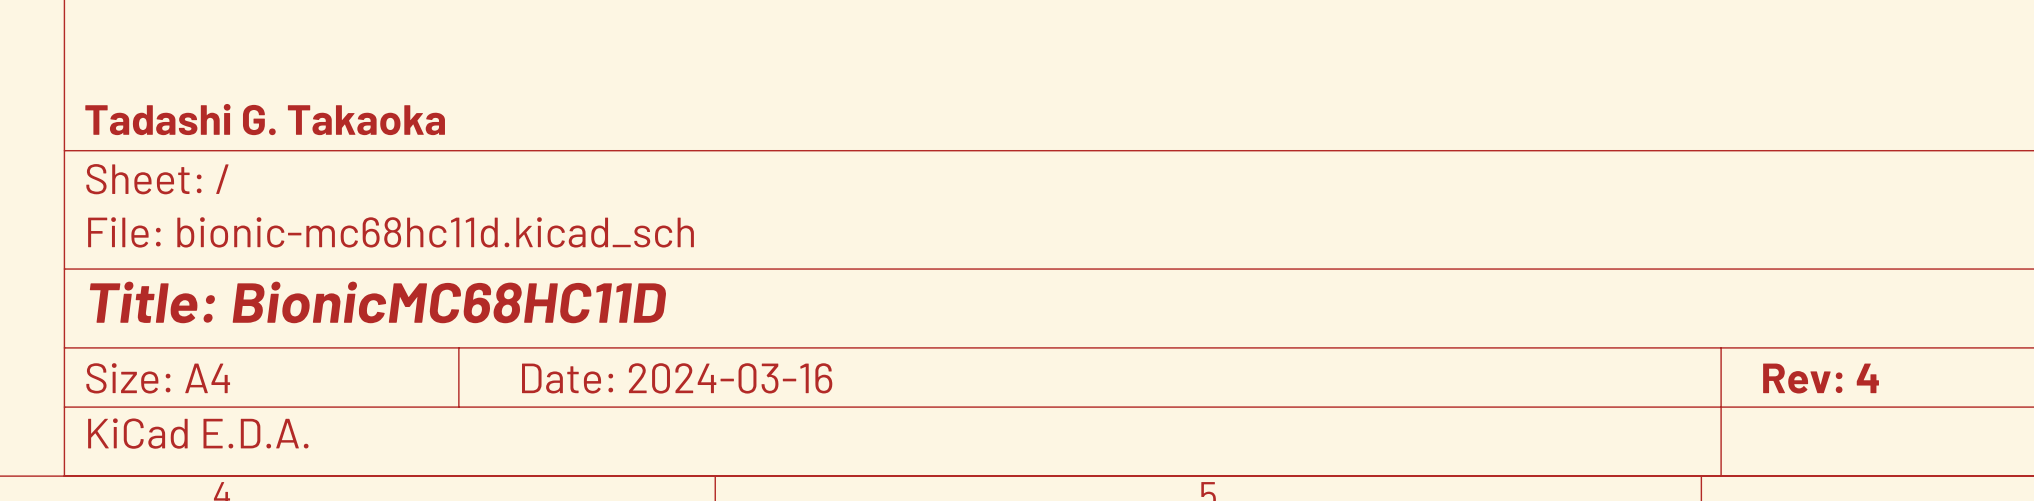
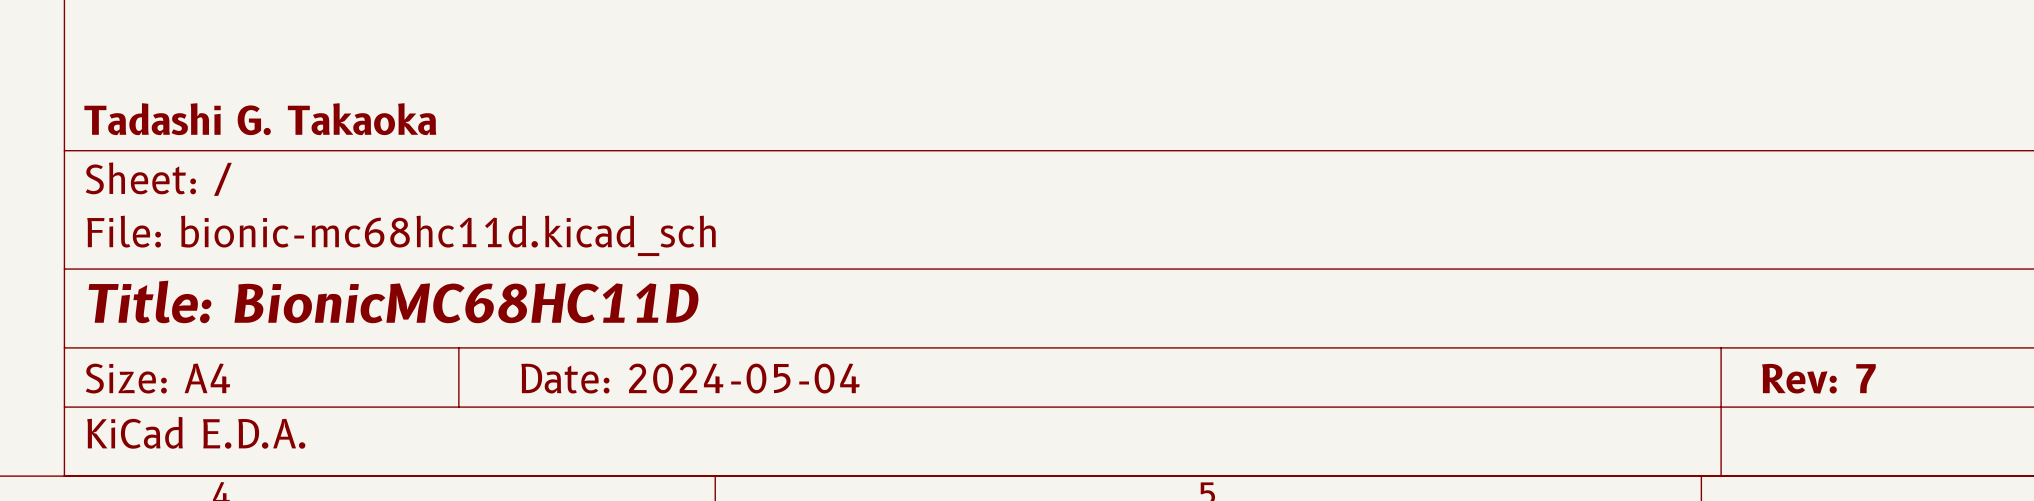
title block: Date: 2024-03-16 (677, 378) -> Date: 2024-05-04 (690, 378)
title block: Rev: 4 (1821, 378) -> Rev: 7 (1818, 378)

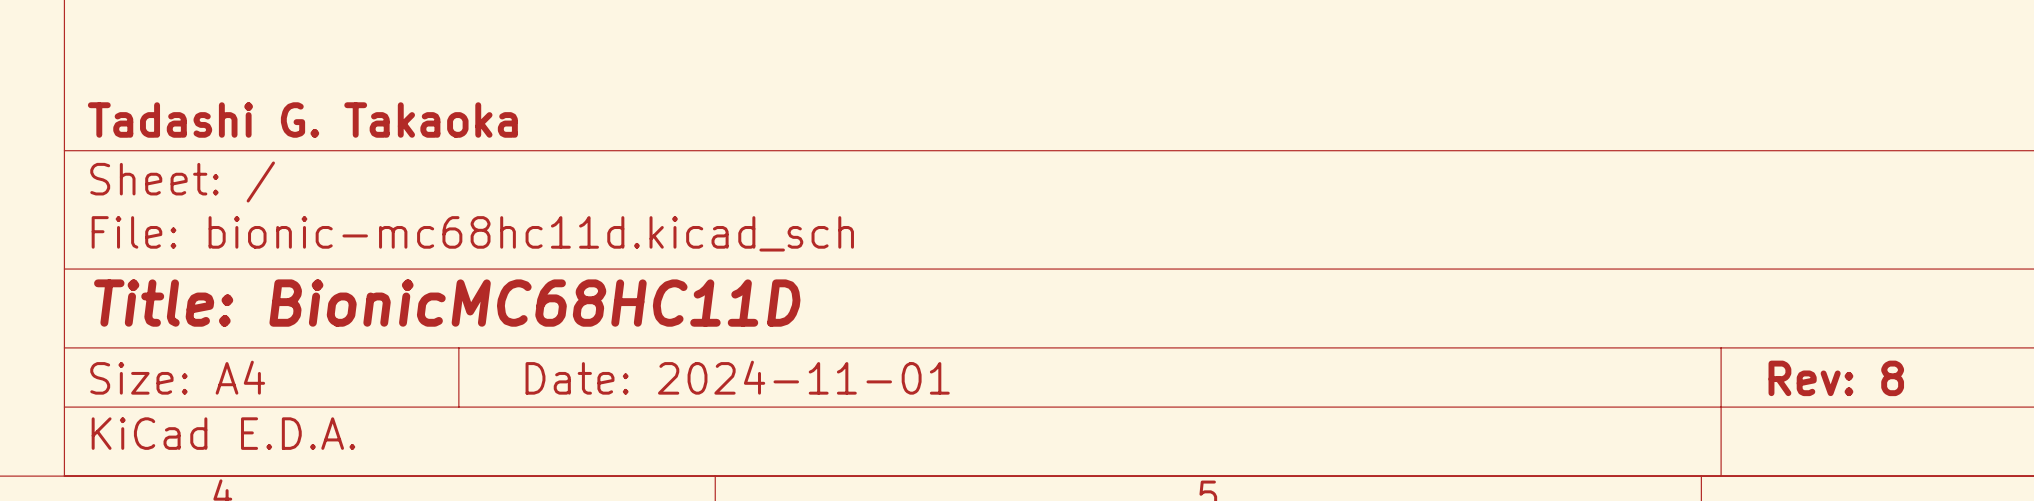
title block: Date: 2024-05-04 (690, 378) -> Date: 2024-11-01 (737, 377)
title block: Rev: 7 (1818, 378) -> Rev: 8 (1836, 378)

